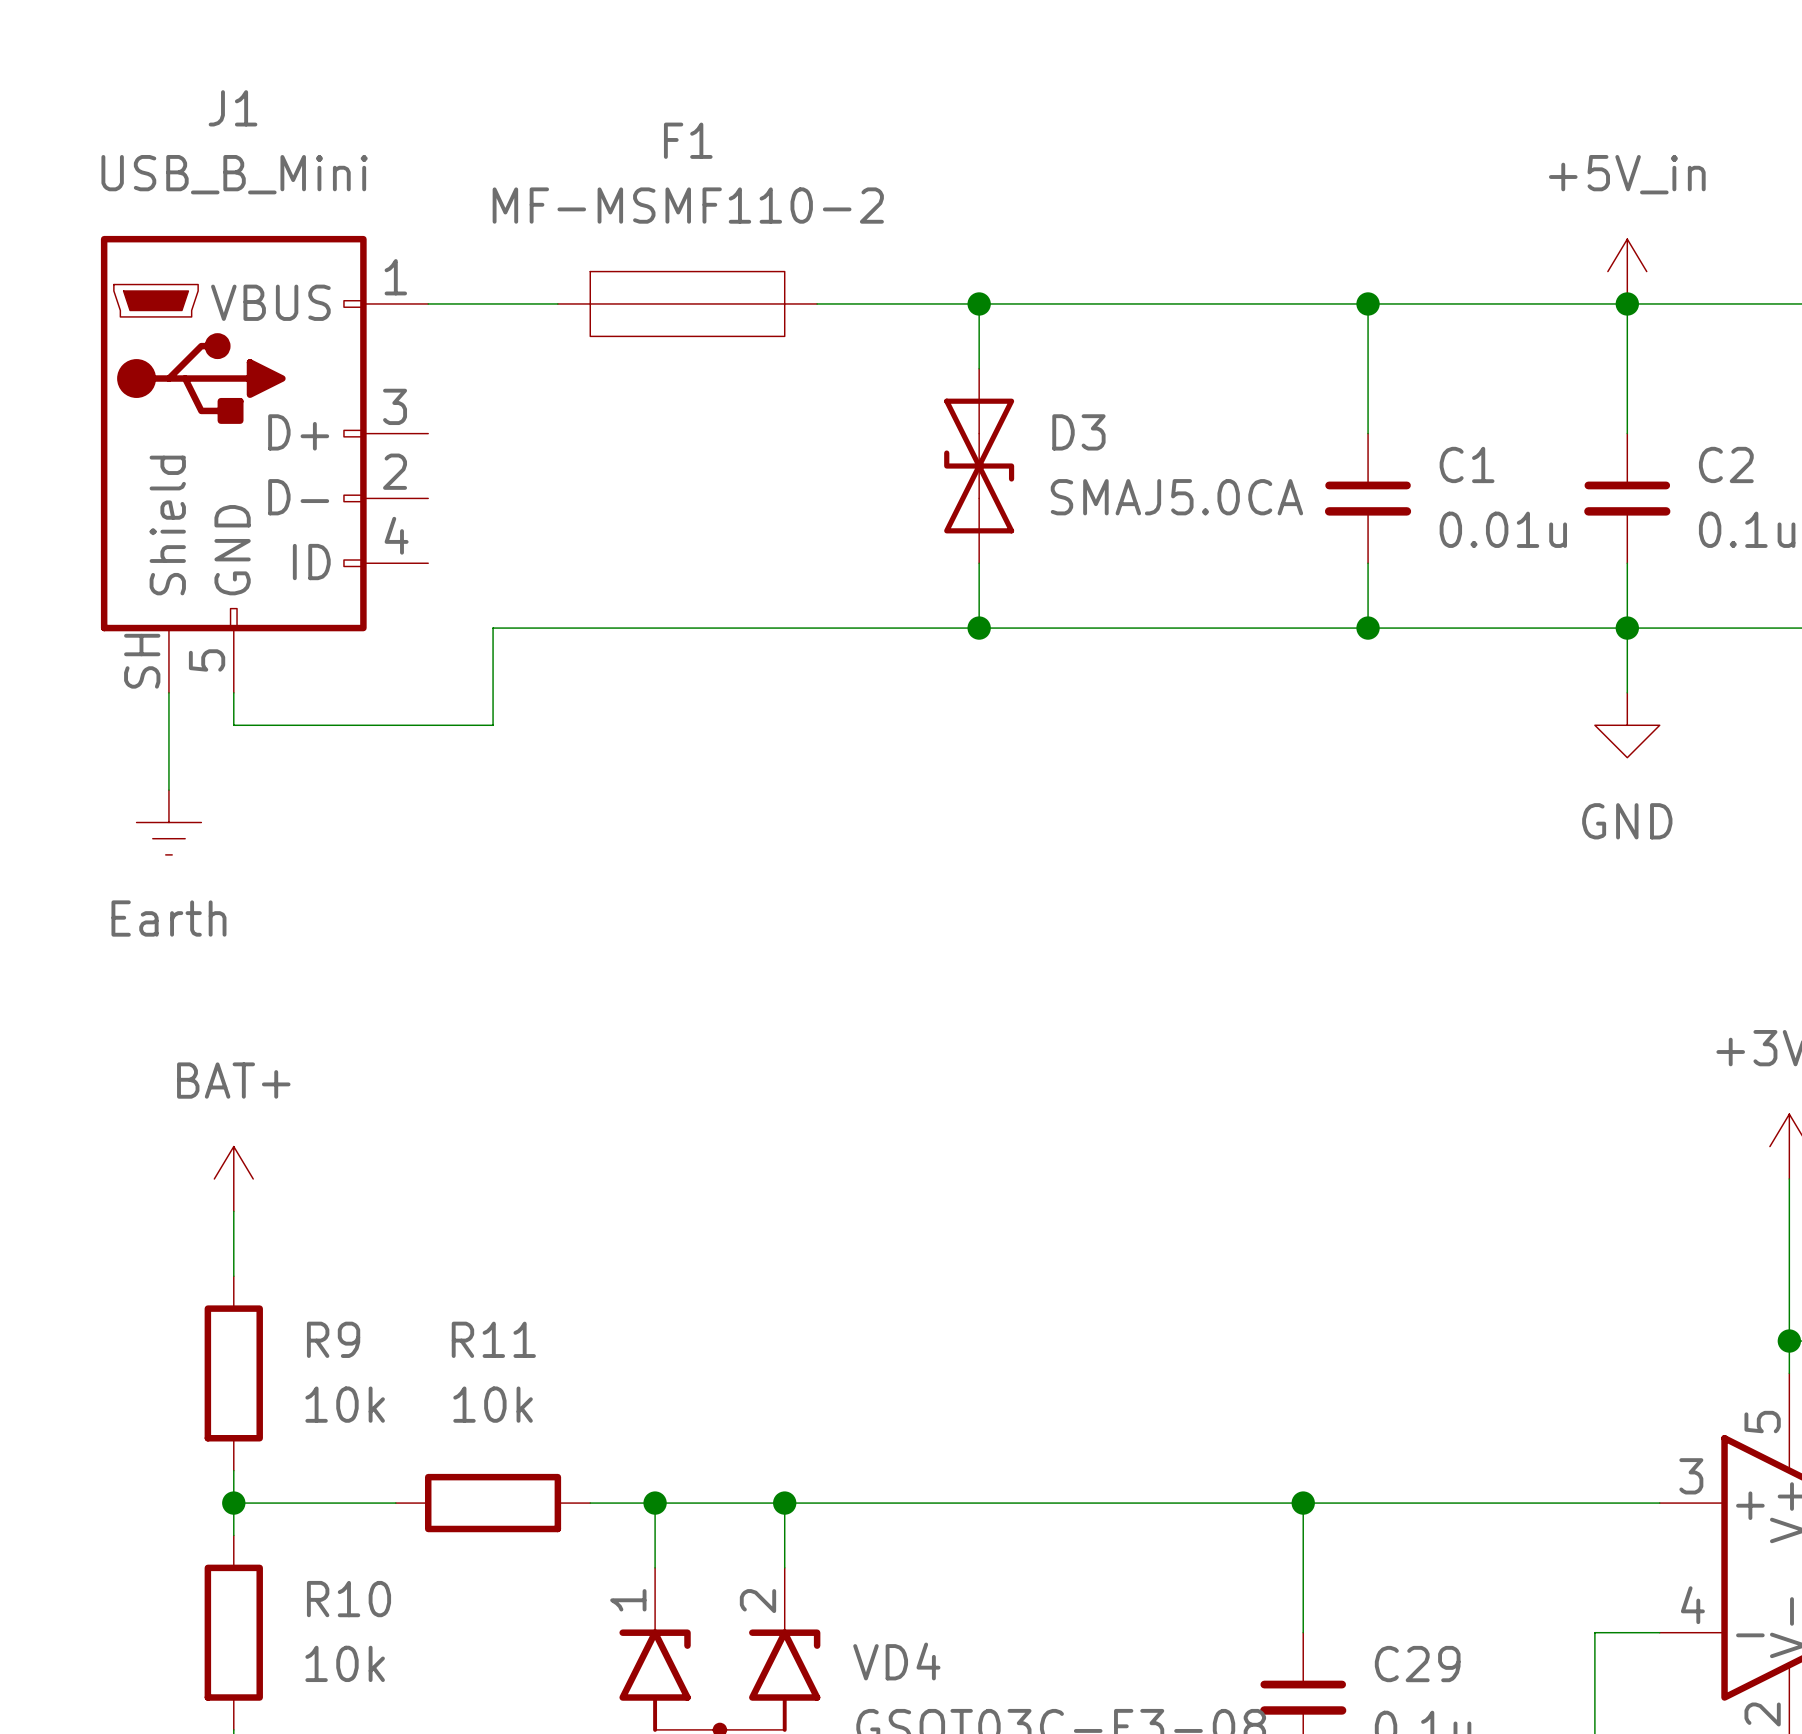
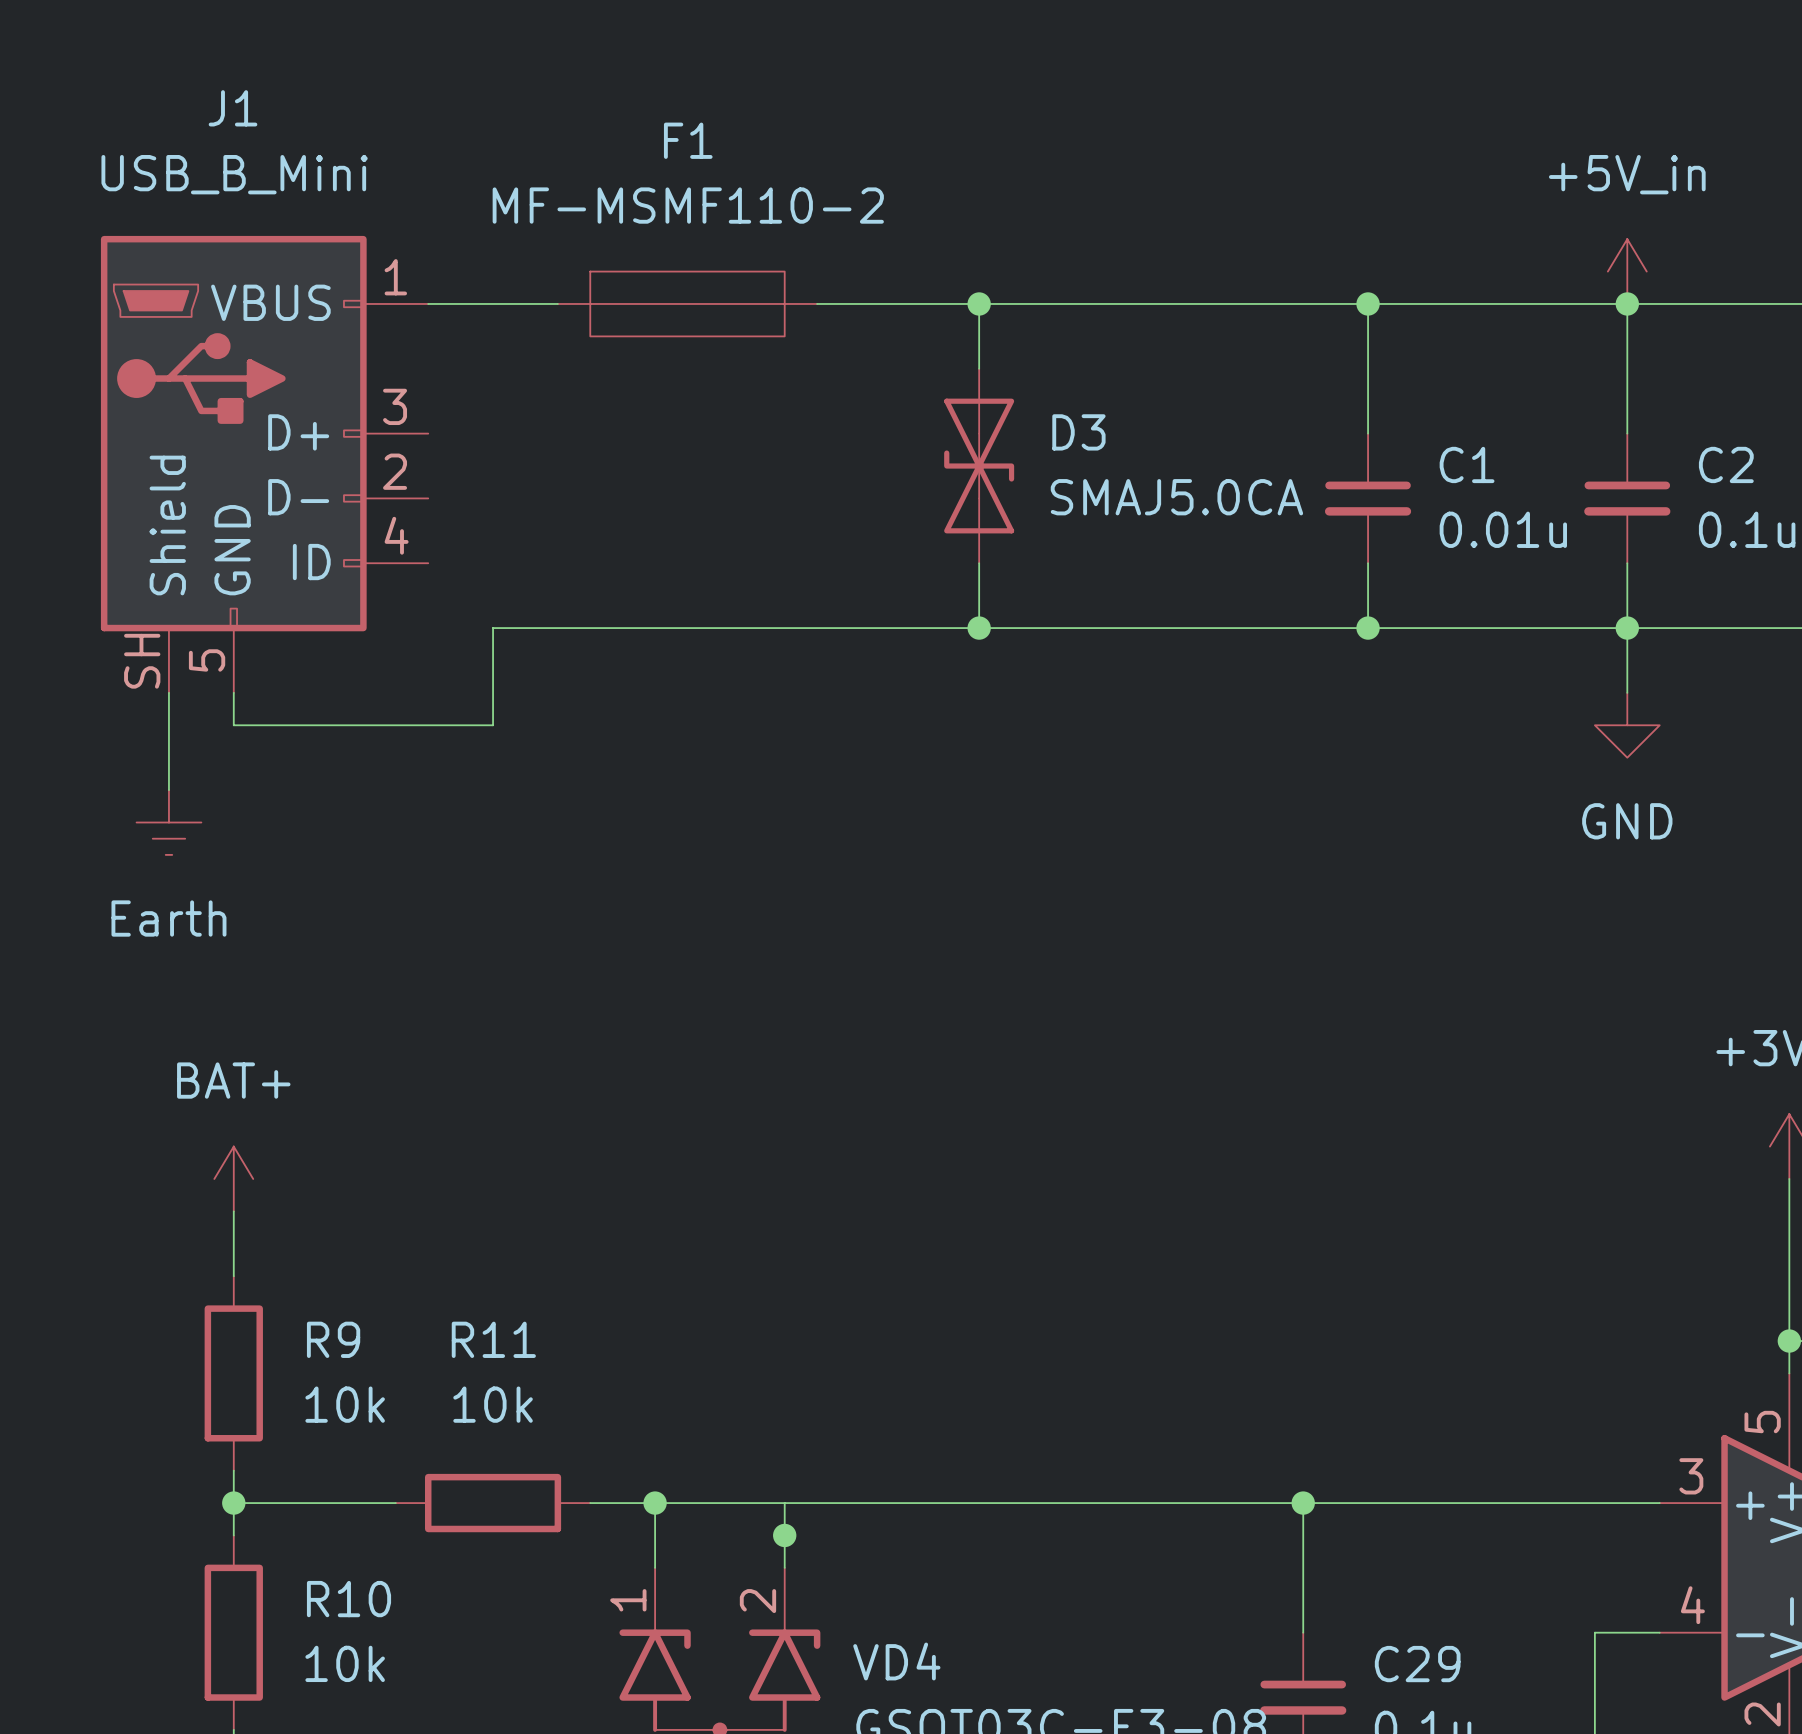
junction position: (784, 1503) -> (784, 1535)

